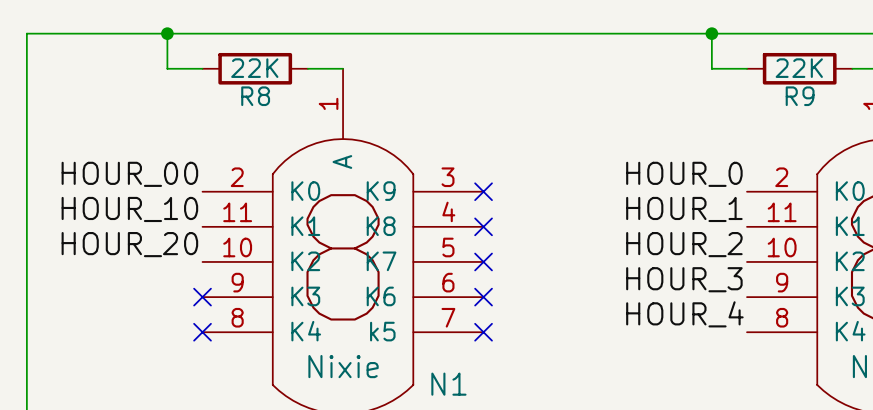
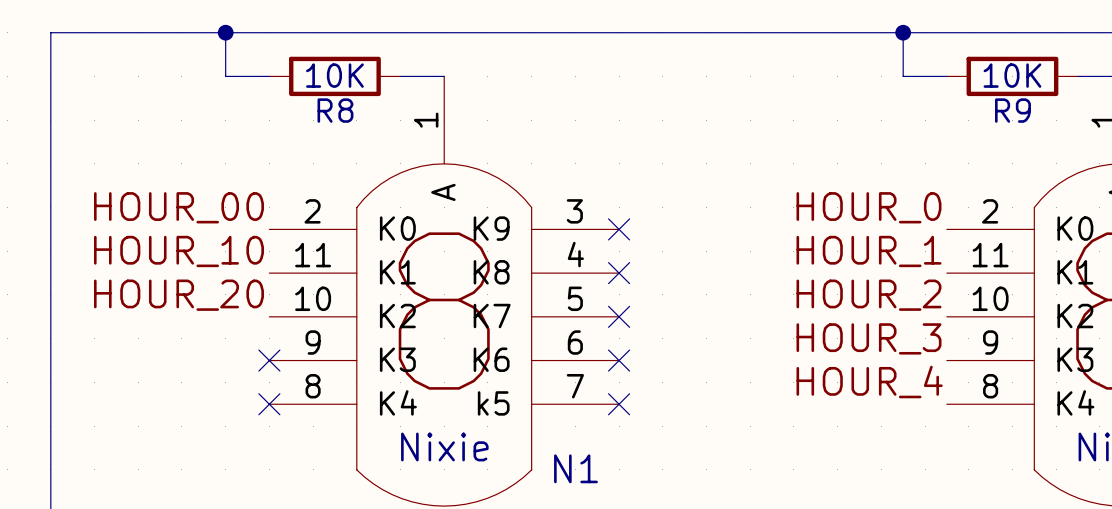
R8 value: 22K (254, 68) -> 10K (334, 75)
R9 value: 22K (799, 68) -> 10K (1012, 75)

